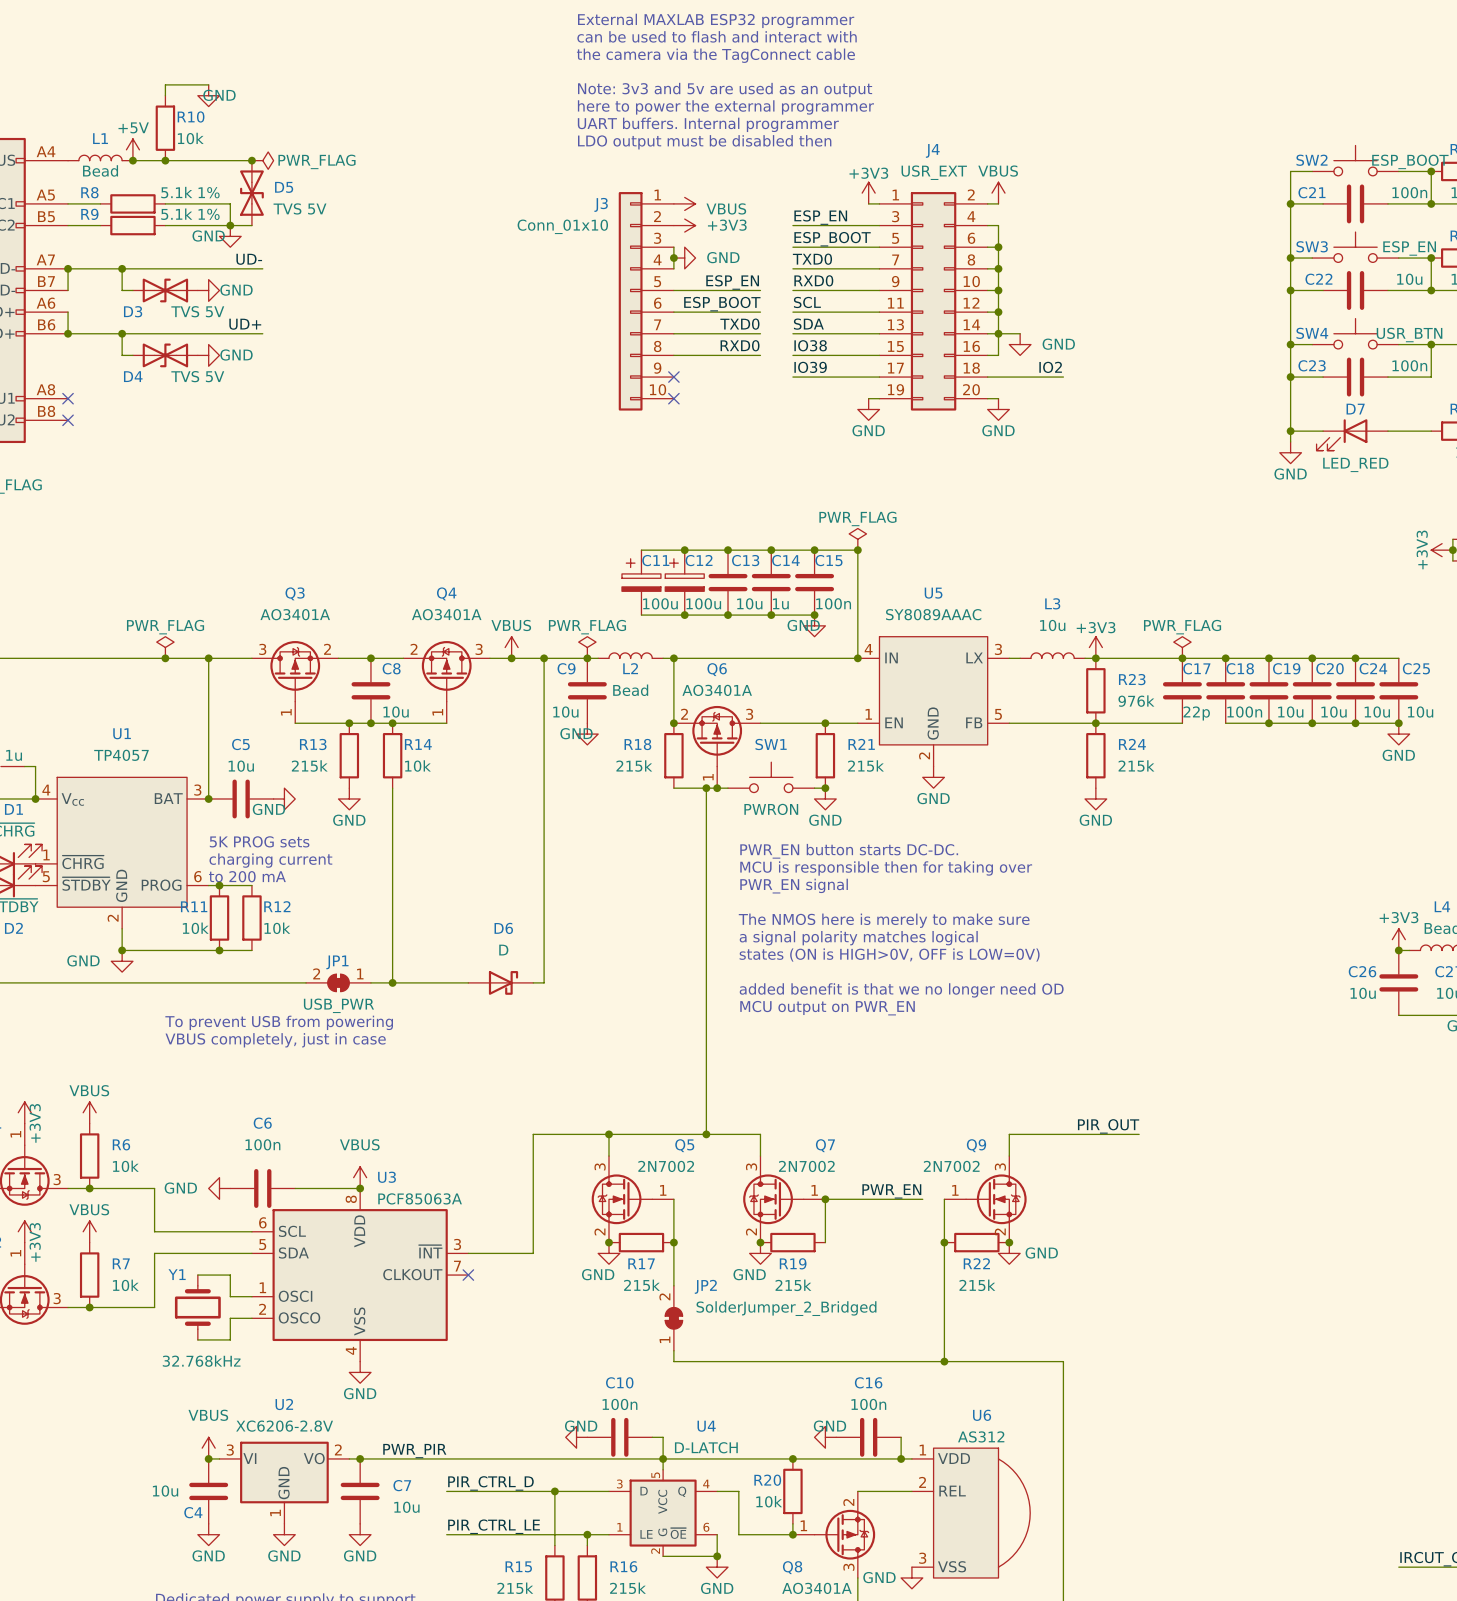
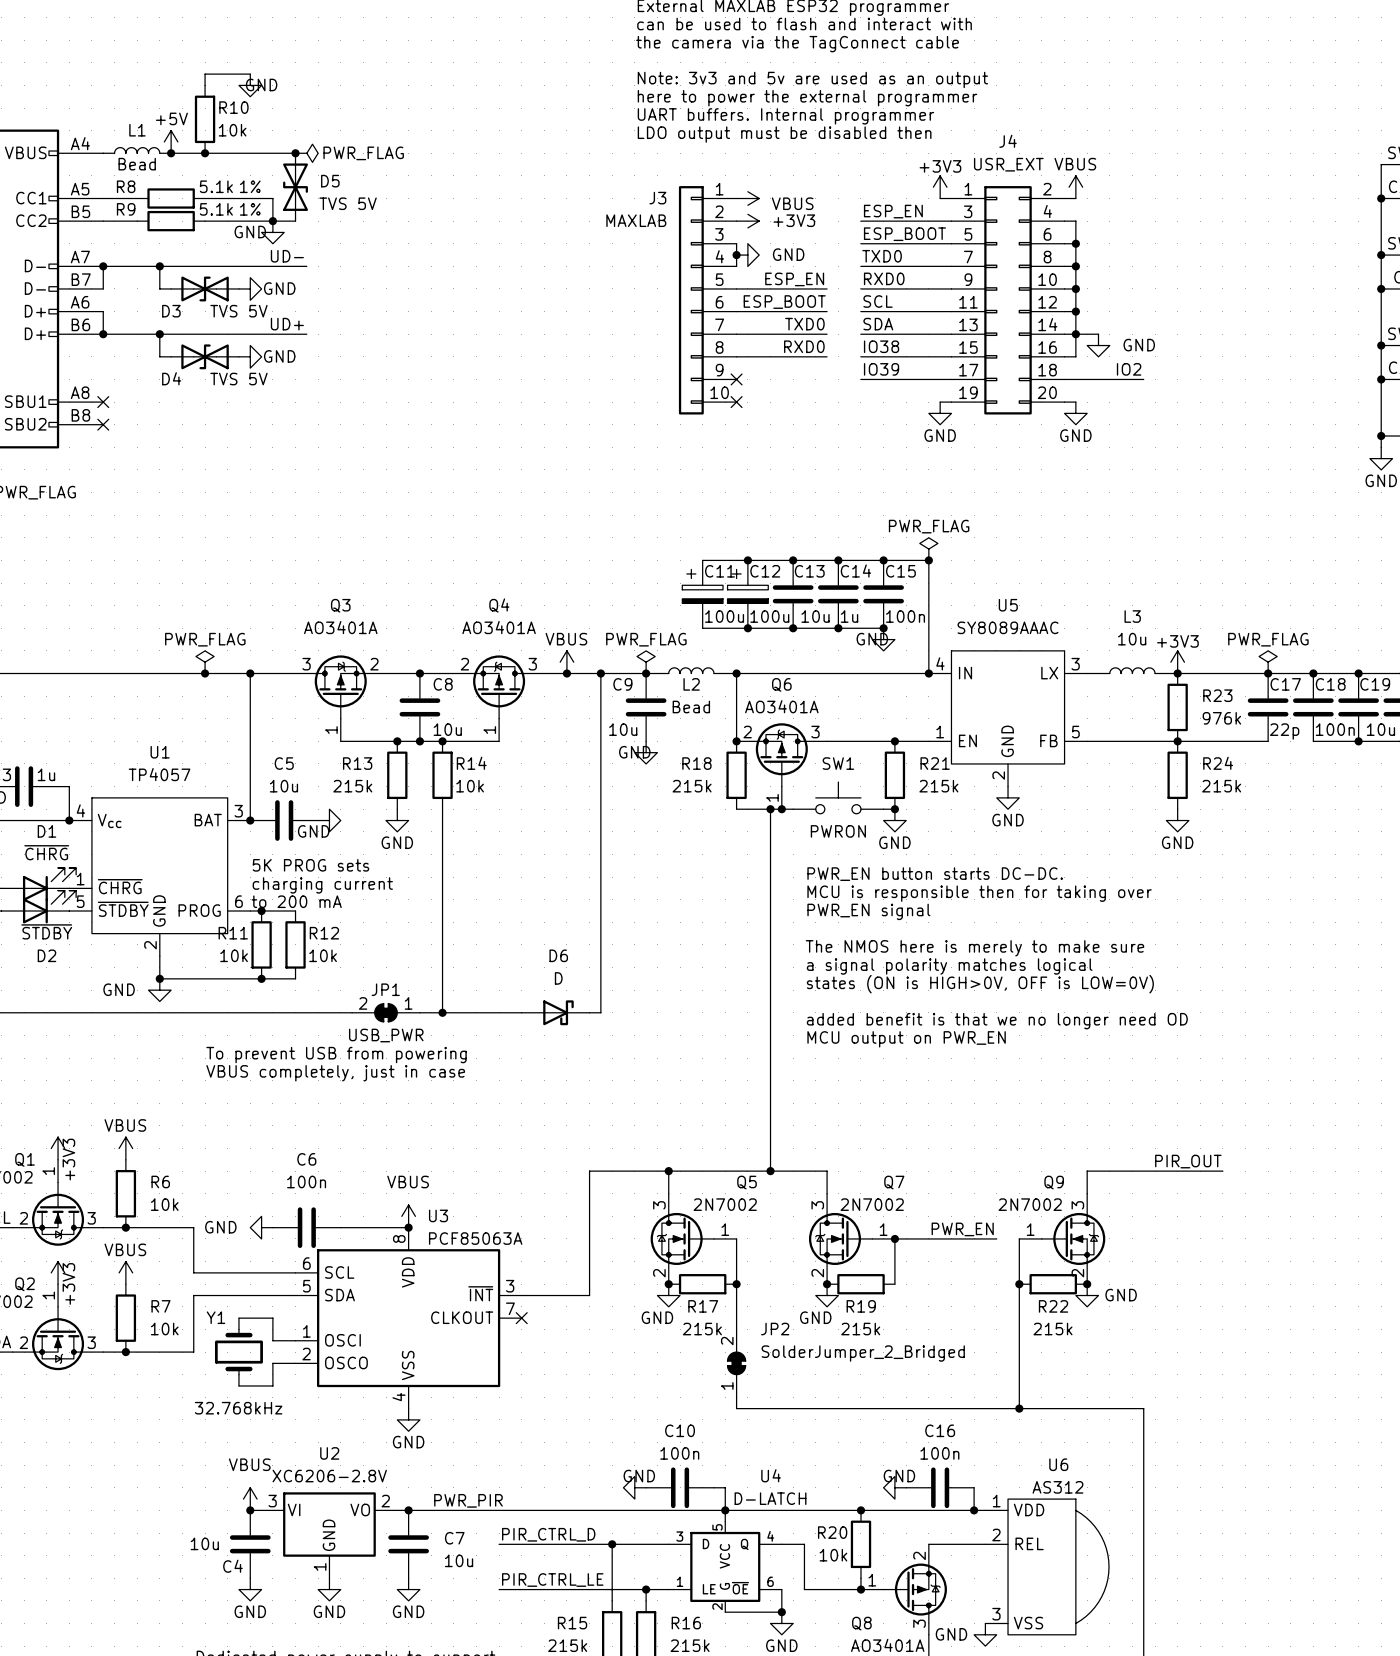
J3 value: Conn_01x10 (562, 226) -> MAXLAB (636, 220)

